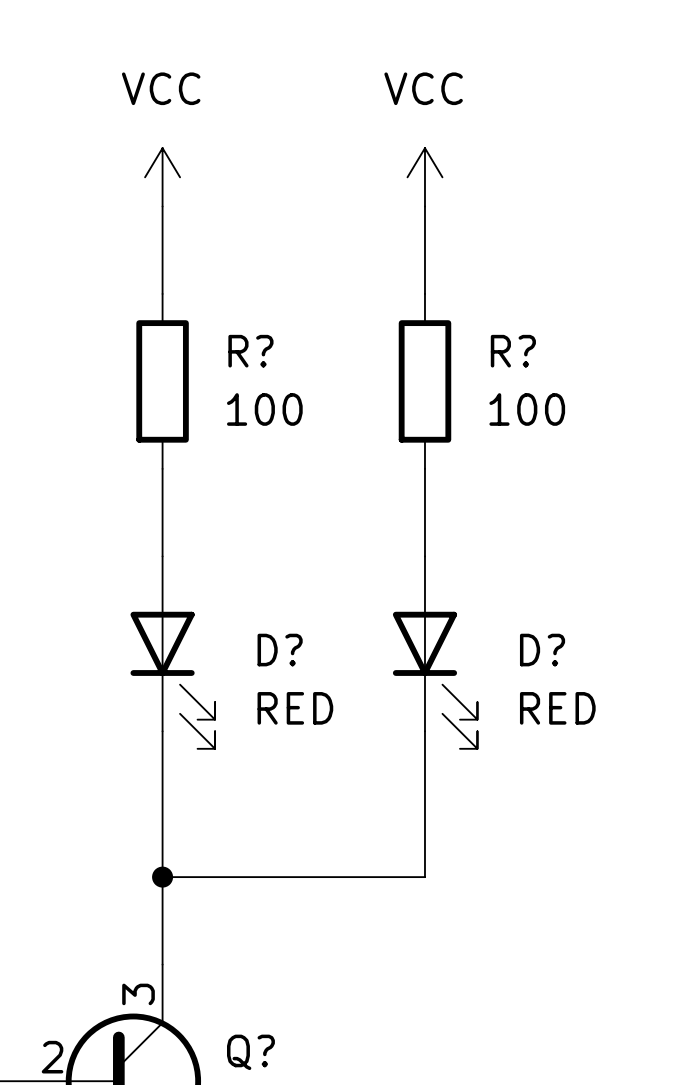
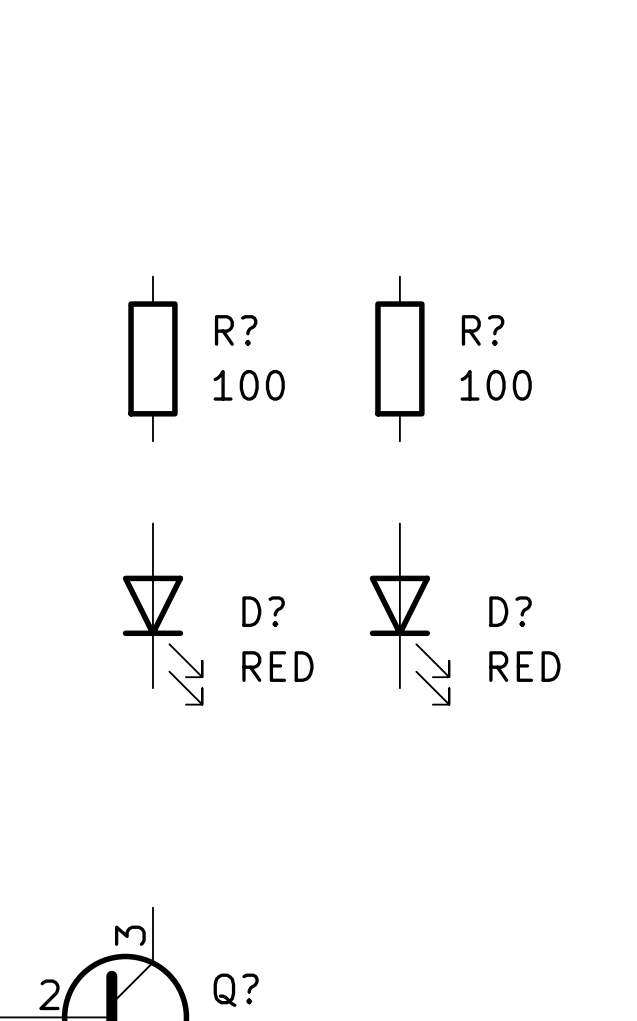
power symbol: VCC (162, 177) -> none
power symbol: VCC (424, 177) -> none
wire: (162, 206) (162, 293) -> none
wire: (424, 206) (424, 293) -> none
wire: (162, 468) (162, 556) -> none
wire: (424, 468) (424, 556) -> none
wire: (162, 731) (162, 964) -> none
wire: (424, 731) (424, 877) (162, 877) -> none
junction: (162, 877) -> none

